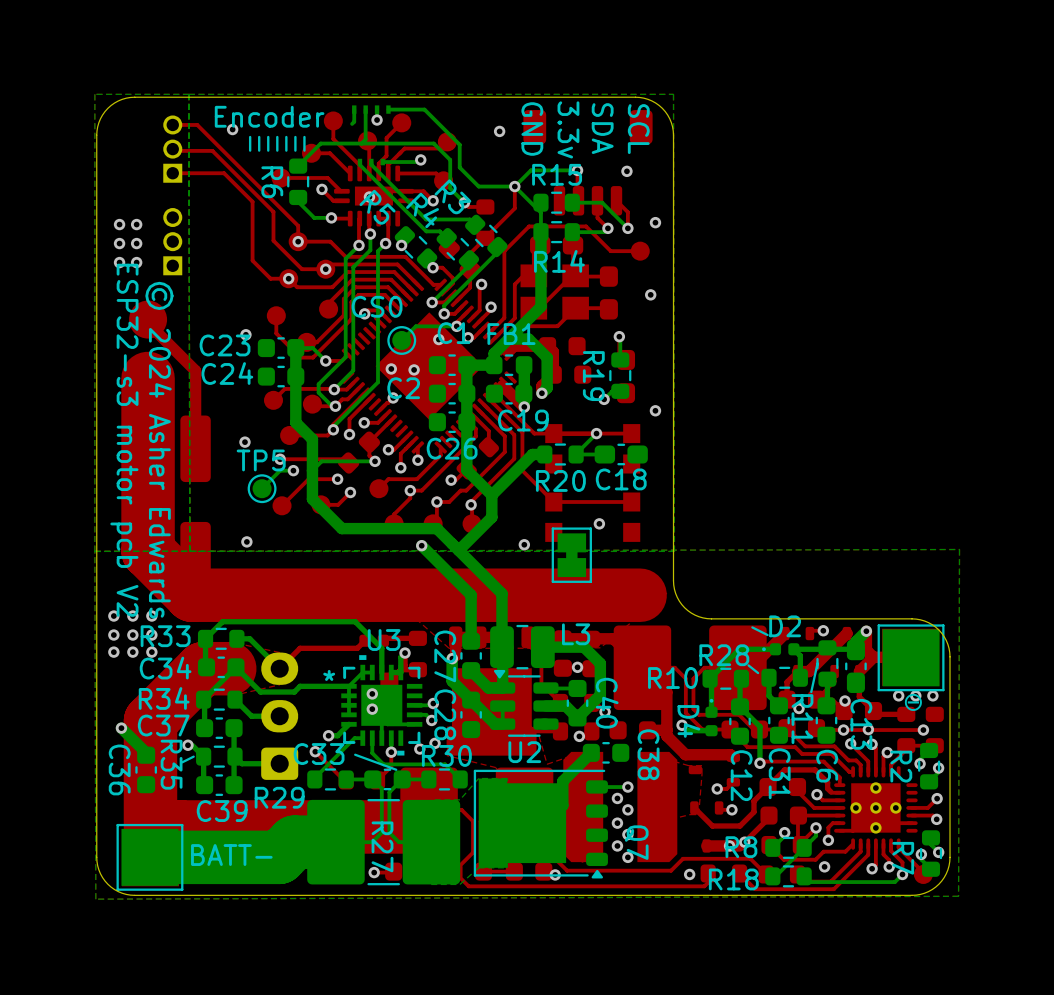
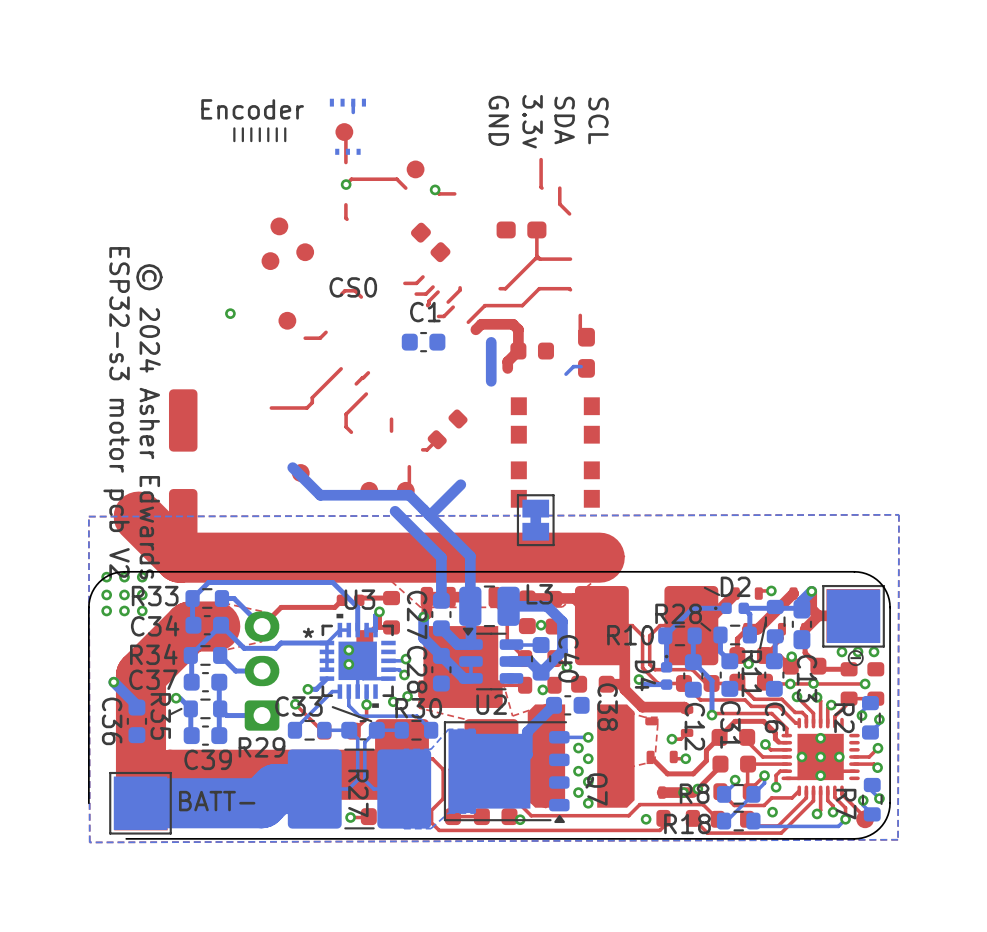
bottom zone outline: (188, 94) (189, 551) -> none
bottom zone outline: (673, 94) (94, 94) (94, 551) (674, 551) (673, 94) -> none
bottom track: (354, 109) (354, 121) (352, 123) -> none
bottom track: (365, 109) (365, 139) (361, 143) -> none
bottom track: (388, 109) (424, 109) (459, 144) (459, 167) (478, 186) (514, 186) -> none
top track: (333, 120) (333, 138) (359, 165) (359, 173) -> none
part: (333, 120) -> none
via: (377, 120) -> none
top track: (401, 122) (386, 138) (386, 155) (378, 163) (378, 173) -> none
part: (401, 122) -> none
top track: (172, 124) (197, 124) (298, 225) (298, 241) (330, 241) (345, 256) (405, 256) (433, 284) (440, 284) -> none
via: (232, 129) -> none
via: (499, 131) -> none
part: (447, 141) -> none
top track: (454, 144) (450, 148) (404, 148) (388, 164) (388, 173) -> none
part: (172, 149) -> none
top track: (311, 153) (330, 153) (350, 173) -> none
part: (311, 153) -> none
top track: (172, 154) (176, 150) (212, 150) (273, 211) (273, 240) (301, 269) (325, 269) (330, 264) (397, 264) (417, 284) -> none
bottom track: (420, 159) (418, 162) (382, 162) -> none
via: (420, 159) -> none
bottom track: (359, 162) (359, 164) (426, 231) (439, 231) (446, 238) -> none
bottom track: (371, 162) (371, 164) (426, 219) (469, 219) (475, 224) -> none
part: (587, 162) -> none
bottom track: (298, 166) (320, 143) (433, 143) (450, 159) (450, 188) (464, 202) -> none
bottom track: (577, 170) (530, 170) (514, 186) -> none
via: (577, 170) -> none
via: (626, 171) -> none
top track: (172, 173) (224, 173) (252, 201) (252, 260) (270, 278) (288, 278) (297, 287) (332, 287) (347, 272) (394, 272) (412, 290) -> none
top track: (397, 173) (436, 173) (443, 180) -> none
top track: (281, 177) (327, 177) (341, 191) -> none
part: (281, 177) -> none
R6: (298, 181) -> none
top track: (514, 186) (514, 208) (470, 253) (470, 287) (456, 300) -> none
bottom track: (514, 186) (540, 212) (540, 232) -> none
via: (514, 186) -> none
top track: (321, 189) (333, 200) (341, 200) -> none
via: (321, 189) -> none
part: (373, 196) -> none
bottom track: (298, 197) (298, 201) (314, 217) (331, 217) -> none
via: (433, 200) -> none
top track: (616, 200) (627, 212) (627, 228) -> none
R15: (556, 202) -> none
bottom track: (572, 202) (602, 202) (627, 228) -> none
top track: (331, 217) (350, 218) -> none
via: (331, 217) -> none
top track: (359, 218) (359, 245) -> none
top track: (378, 218) (388, 218) (388, 240) (385, 243) -> none
part: (485, 222) -> none
via: (655, 222) -> none
via: (119, 224) -> none
via: (136, 224) -> none
bottom track: (607, 228) (604, 232) (572, 232) -> none
via: (607, 228) -> none
via: (627, 228) -> none
bottom track: (540, 232) (540, 306) (494, 353) (494, 365) (466, 365) (466, 470) (491, 495) -> none
R14: (556, 232) -> none
bottom track: (370, 234) (370, 250) (353, 267) (353, 370) (334, 389) -> none
via: (370, 234) -> none
R3: (486, 235) -> none
part: (172, 241) -> none
via: (298, 241) -> none
via: (119, 243) -> none
via: (136, 243) -> none
bottom track: (385, 243) (378, 251) (378, 382) (333, 426) (333, 429) -> none
via: (385, 243) -> none
bottom track: (359, 245) (345, 258) (345, 357) (318, 384) (318, 392) (332, 406) (335, 406) -> none
via: (359, 245) -> none
via: (401, 245) -> none
top track: (540, 245) (533, 251) (533, 275) (523, 275) (514, 284) (514, 318) (494, 338) -> none
R5: (416, 247) -> none
bottom track: (497, 247) (497, 252) (444, 305) (444, 313) -> none
R4: (457, 249) -> none
top track: (640, 251) (610, 251) (586, 226) (529, 226) (504, 251) (504, 317) (489, 333) -> none
part: (640, 251) -> none
bottom track: (468, 260) (468, 265) (432, 302) -> none
via: (119, 262) -> none
via: (136, 262) -> none
top track: (433, 267) (442, 267) (452, 278) (452, 283) (446, 290) -> none
via: (433, 267) -> none
via: (325, 269) -> none
via: (288, 278) -> none
top track: (481, 284) (479, 286) (479, 310) (472, 317) -> none
via: (481, 284) -> none
part: (554, 292) -> none
part: (608, 292) -> none
via: (650, 294) -> none
top track: (407, 295) (391, 279) (352, 279) (328, 303) (328, 309) -> none
top track: (401, 300) (388, 287) (355, 287) (343, 298) (343, 315) (316, 342) (306, 342) -> none
via: (432, 302) -> none
top track: (396, 306) (384, 294) (358, 294) (351, 302) (351, 319) (313, 357) (300, 357) (276, 333) (276, 315) -> none
via: (491, 307) -> none
part: (328, 309) -> none
via: (364, 313) -> none
via: (444, 313) -> none
part: (276, 315) -> none
top track: (148, 319) (148, 323) (195, 370) (195, 448) -> none
part: (148, 319) -> none
bottom track: (456, 326) (415, 326) (401, 340) -> none
via: (456, 326) -> none
bottom track: (619, 336) (620, 359) -> none
via: (619, 336) -> none
via: (468, 337) -> none
via: (438, 339) -> none
bottom track: (508, 339) (528, 339) (547, 357) (547, 388) (541, 393) -> none
part: (401, 340) -> none
part: (562, 346) -> none
C23: (281, 348) -> none
bottom track: (325, 360) (312, 348) (295, 348) (295, 422) (312, 439) (312, 499) -> none
via: (325, 360) -> none
FB1: (509, 365) -> none
part: (429, 366) -> none
via: (391, 368) -> none
via: (414, 369) -> none
R19: (620, 375) -> none
C24: (281, 376) -> none
top track: (148, 378) (148, 551) -> none
top track: (353, 382) (346, 389) (284, 388) (273, 400) -> none
top track: (502, 385) (524, 406) -> none
top track: (358, 388) (347, 399) (342, 399) (335, 406) (314, 406) (312, 404) -> none
via: (334, 389) -> none
C2: (452, 393) -> none
top track: (494, 393) (534, 433) (631, 433) -> none
C19: (509, 393) -> none
via: (541, 393) -> none
via: (393, 397) -> none
top track: (369, 399) (349, 419) (349, 434) -> none
top track: (489, 399) (522, 432) (522, 470) (553, 502) (631, 502) -> none
via: (604, 399) -> none
part: (273, 400) -> none
part: (312, 404) -> none
top track: (483, 404) (514, 435) (514, 458) (471, 502) (472, 523) -> none
via: (335, 406) -> none
via: (524, 406) -> none
top track: (478, 409) (504, 436) (504, 452) (466, 490) (460, 490) (449, 502) (436, 502) -> none
via: (655, 410) -> none
top track: (385, 415) (377, 422) (364, 422) -> none
top track: (472, 415) (488, 431) (488, 447) -> none
top track: (467, 420) (475, 428) (475, 436) (421, 490) (410, 490) (410, 498) (394, 514) (394, 523) -> none
via: (364, 422) -> none
C26: (452, 422) -> none
via: (333, 429) -> none
bottom track: (596, 433) (576, 454) (604, 454) -> none
via: (596, 433) -> none
via: (349, 434) -> none
part: (289, 435) -> none
top track: (407, 436) (394, 449) (388, 449) -> none
via: (244, 442) -> none
top track: (412, 442) (400, 453) (400, 467) -> none
top track: (440, 447) (440, 455) (416, 479) (388, 479) (378, 488) -> none
via: (388, 449) -> none
part: (359, 452) -> none
bottom track: (544, 454) (532, 454) (491, 495) -> none
R20: (560, 454) -> none
C18: (621, 454) -> none
top track: (280, 459) (344, 459) (348, 463) -> none
via: (280, 459) -> none
via: (417, 460) -> none
bottom track: (375, 461) (321, 461) (312, 470) -> none
via: (375, 461) -> none
via: (400, 467) -> none
via: (293, 470) -> none
bottom track: (293, 473) (293, 470) (280, 470) (262, 488) -> none
top track: (337, 479) (308, 479) (282, 505) -> none
via: (337, 479) -> none
via: (451, 480) -> none
TP5: (262, 488) -> none
part: (378, 488) -> none
via: (410, 490) -> none
top track: (350, 492) (338, 504) (320, 504) -> none
via: (350, 492) -> none
bottom track: (491, 495) (491, 517) -> none
via: (436, 502) -> none
via: (471, 504) -> none
part: (282, 505) -> none
part: (472, 523) -> none
via: (599, 523) -> none
via: (246, 541) -> none
via: (524, 544) -> none
via: (421, 545) -> none
board edge: (950, 656) (947, 644) (941, 633) (932, 624) (920, 619) (707, 618) (687, 610) (677, 597) (673, 580) (673, 135) (669, 118) (655, 103) (635, 97) (134, 97) (122, 99) (105, 111) (98, 122) (96, 135) (96, 857) (100, 873) (107, 884) (122, 893) (134, 895) -> (890, 615) (889, 599) (882, 585) (869, 575) (854, 571) (116, 572) (99, 582) (92, 591) (89, 603) (88, 803)

